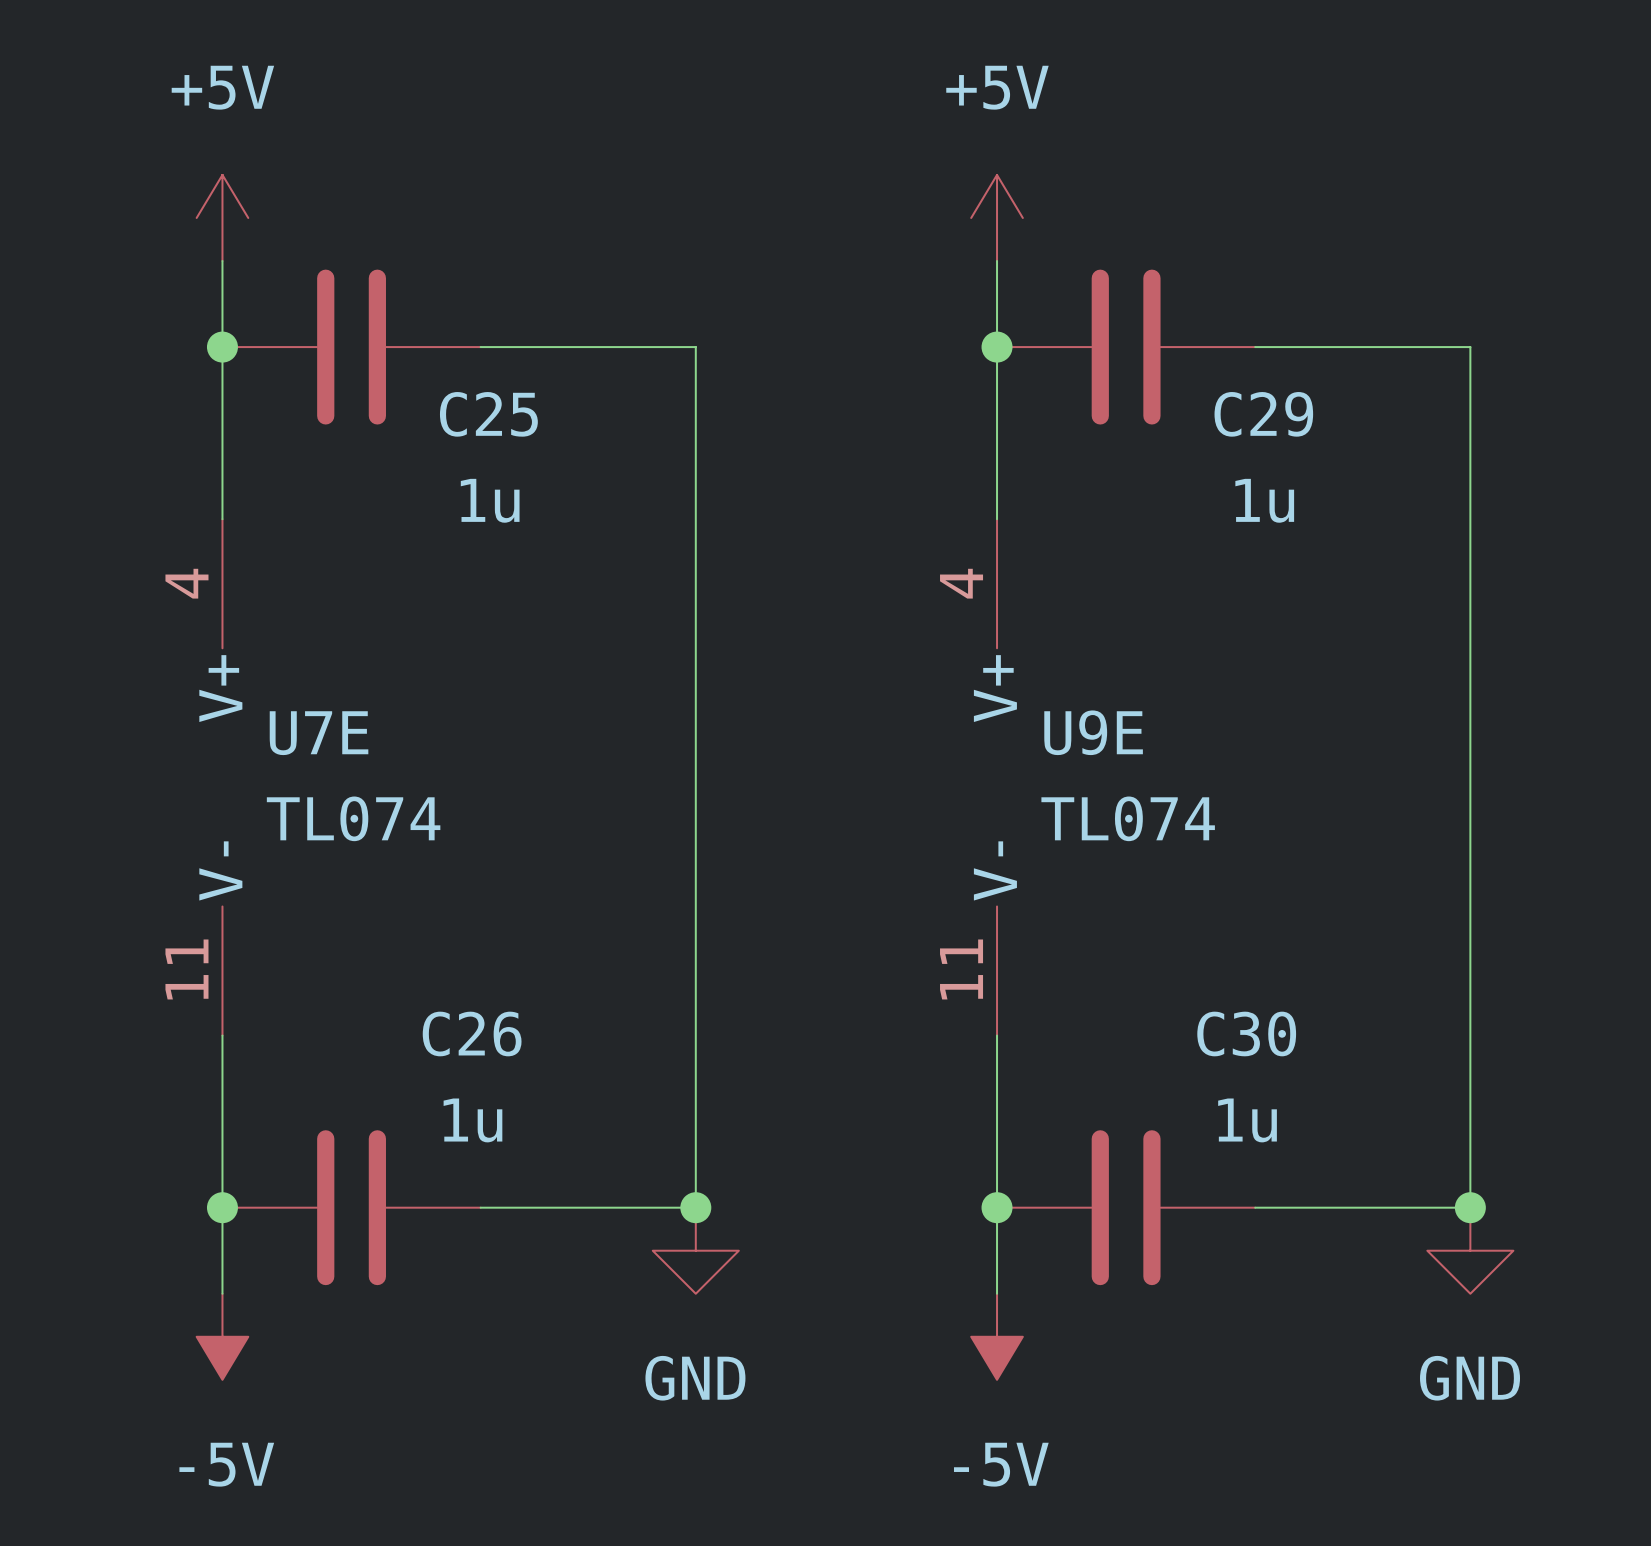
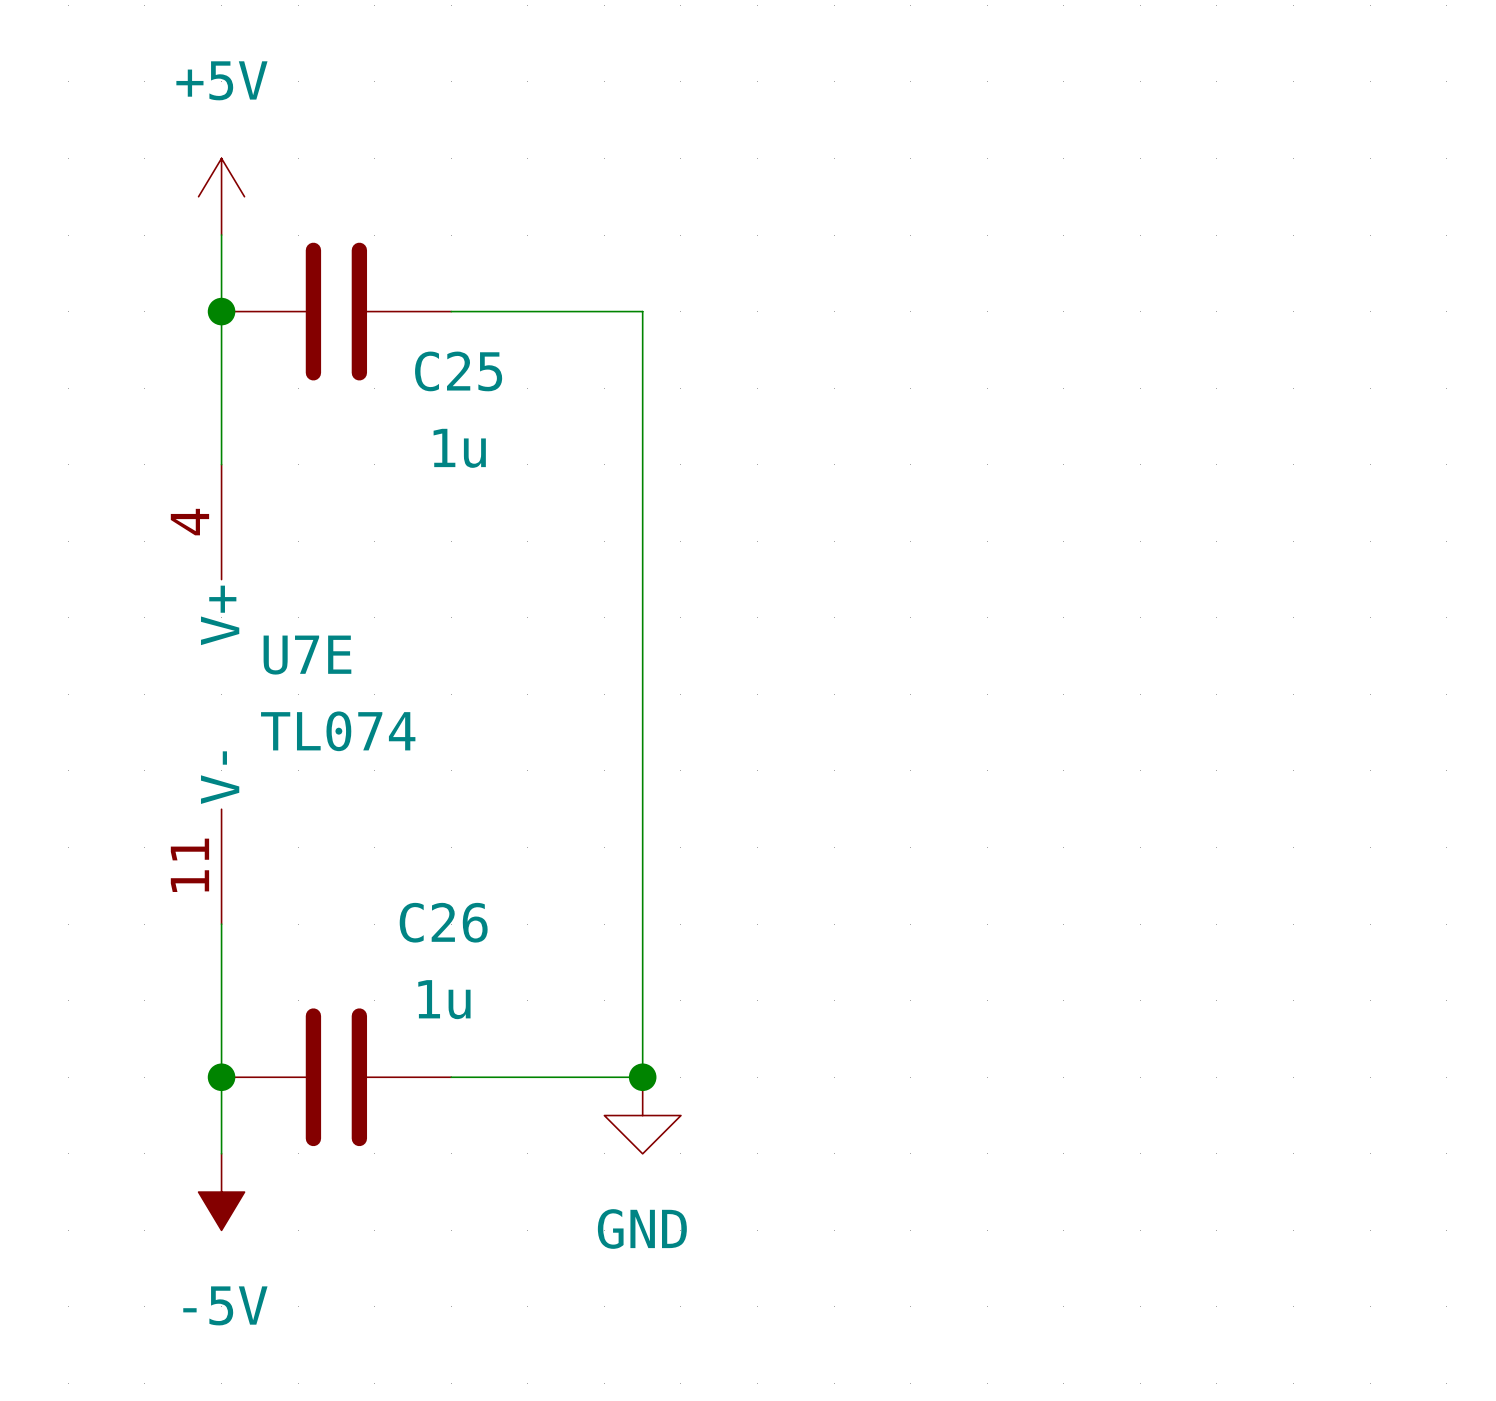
power symbol: +5V (997, 217) -> none
wire: (997, 261) (997, 519) -> none
junction: (997, 347) -> none
C29: 1u (1126, 347) -> none
wire: (1255, 347) (1470, 347) (1470, 1207) (1255, 1207) -> none
U9E: TL074 (997, 777) -> none
wire: (997, 1035) (997, 1293) -> none
junction: (997, 1207) -> none
C30: 1u (1126, 1207) -> none
junction: (1470, 1207) -> none
power symbol: GND (1470, 1250) -> none
power symbol: -5V (997, 1336) -> none

